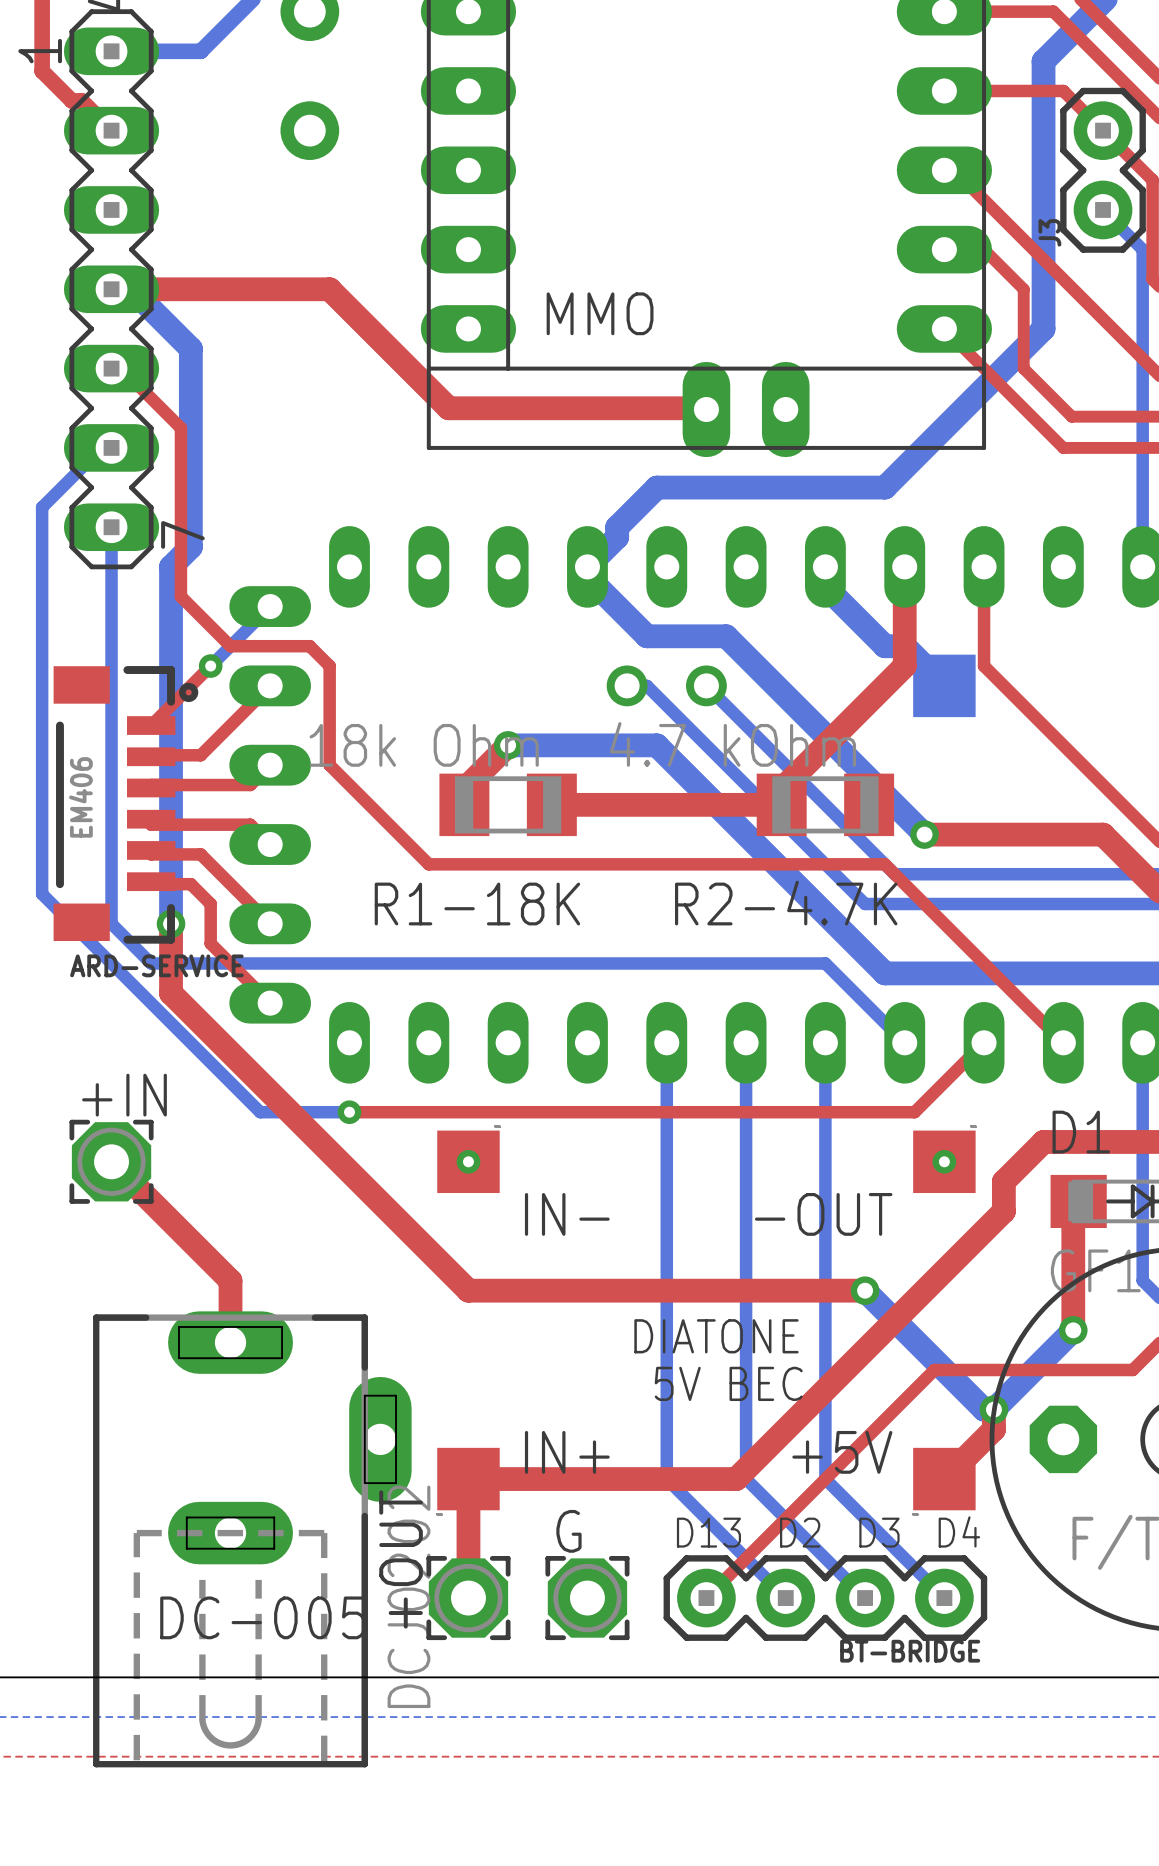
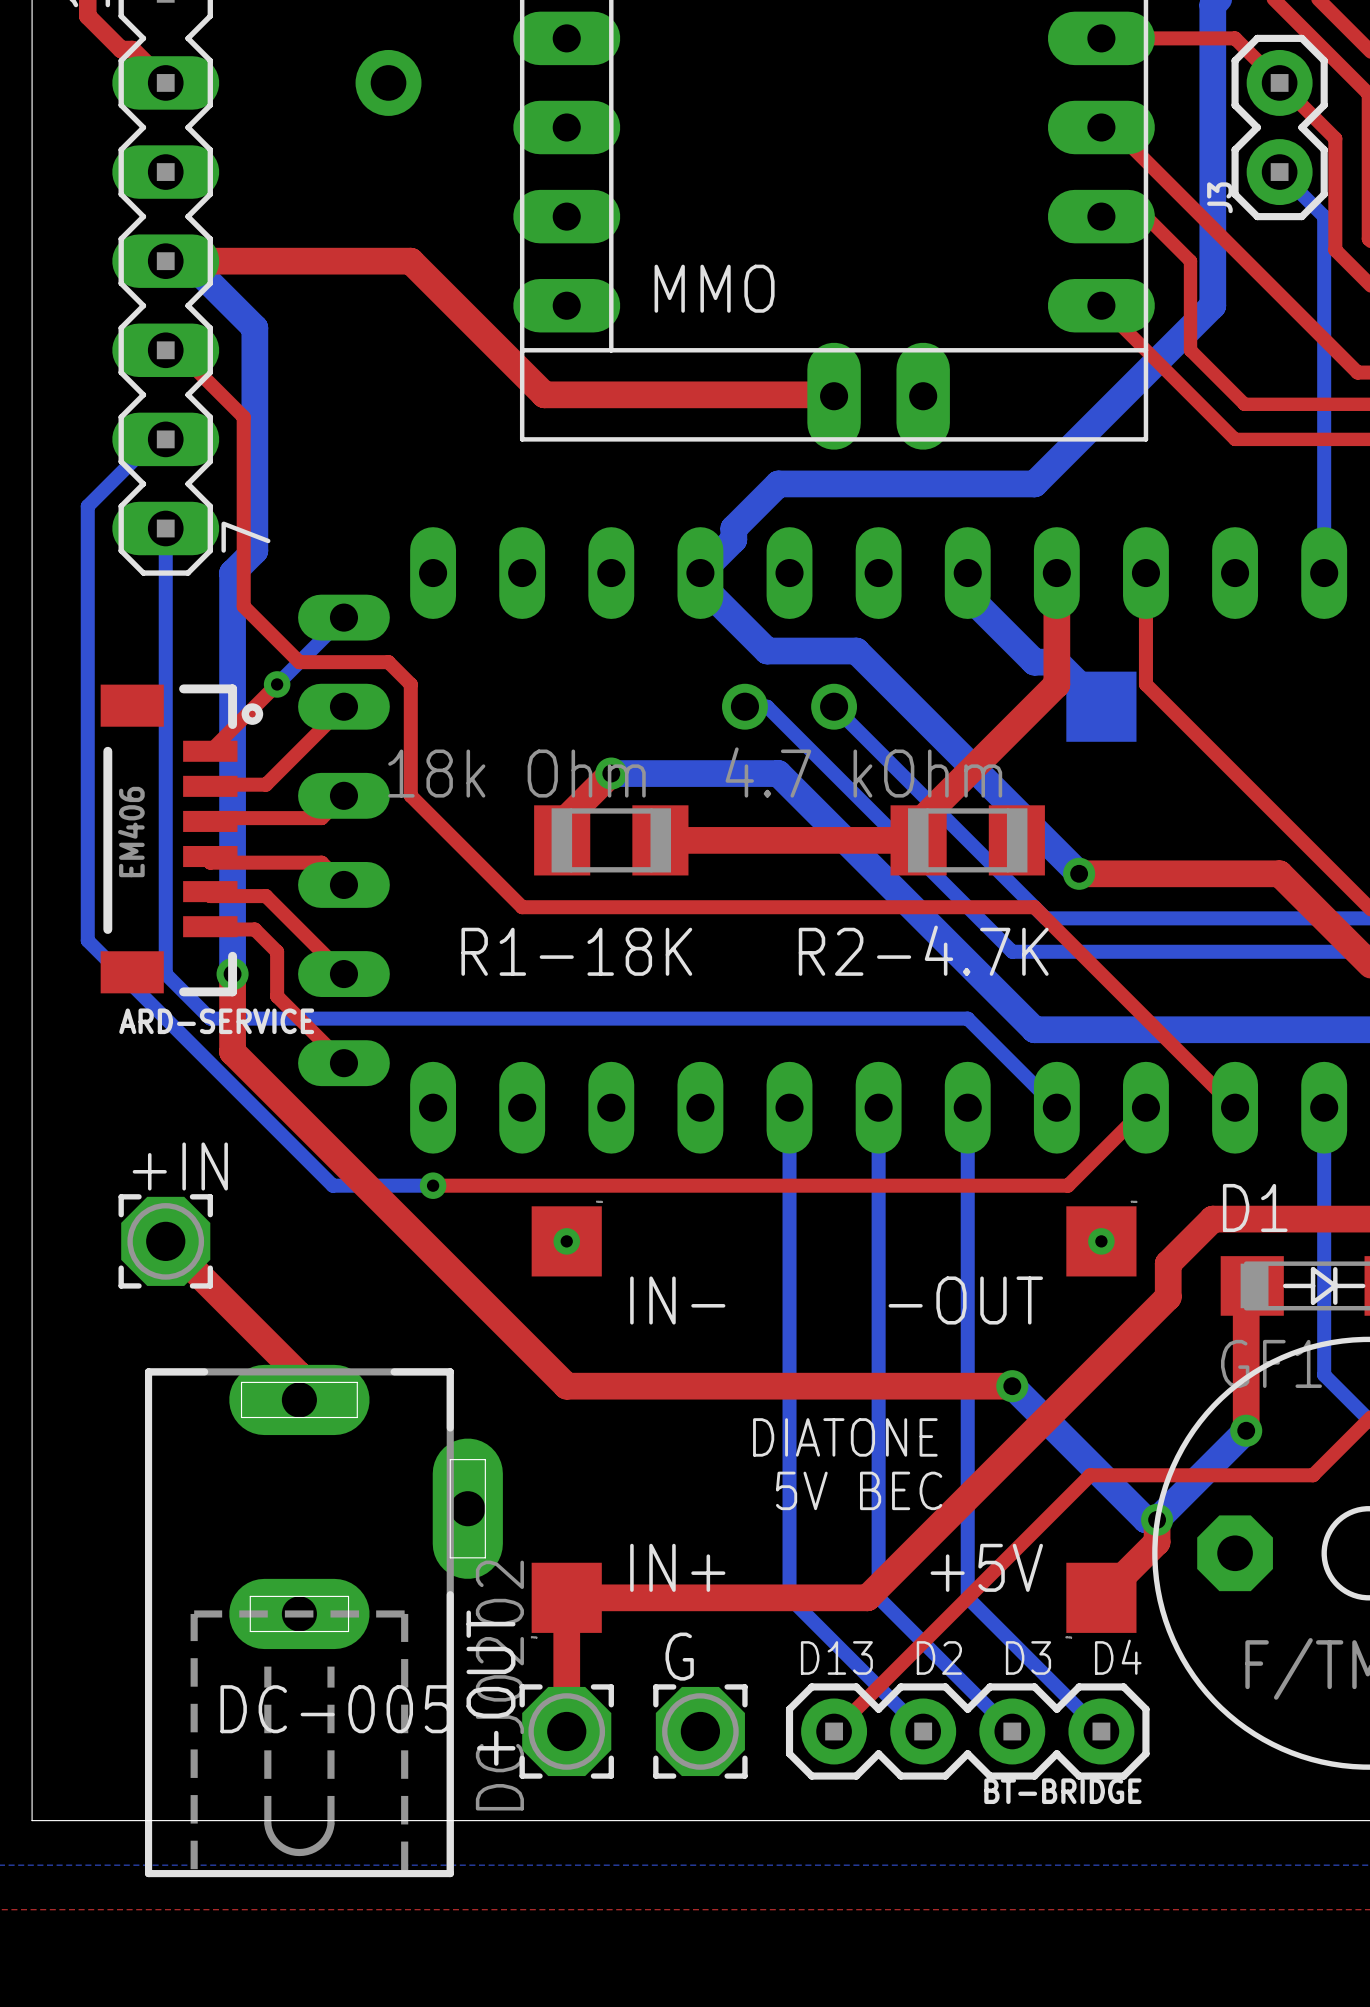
DC-005 position: (252, 1539) -> (323, 1621)

